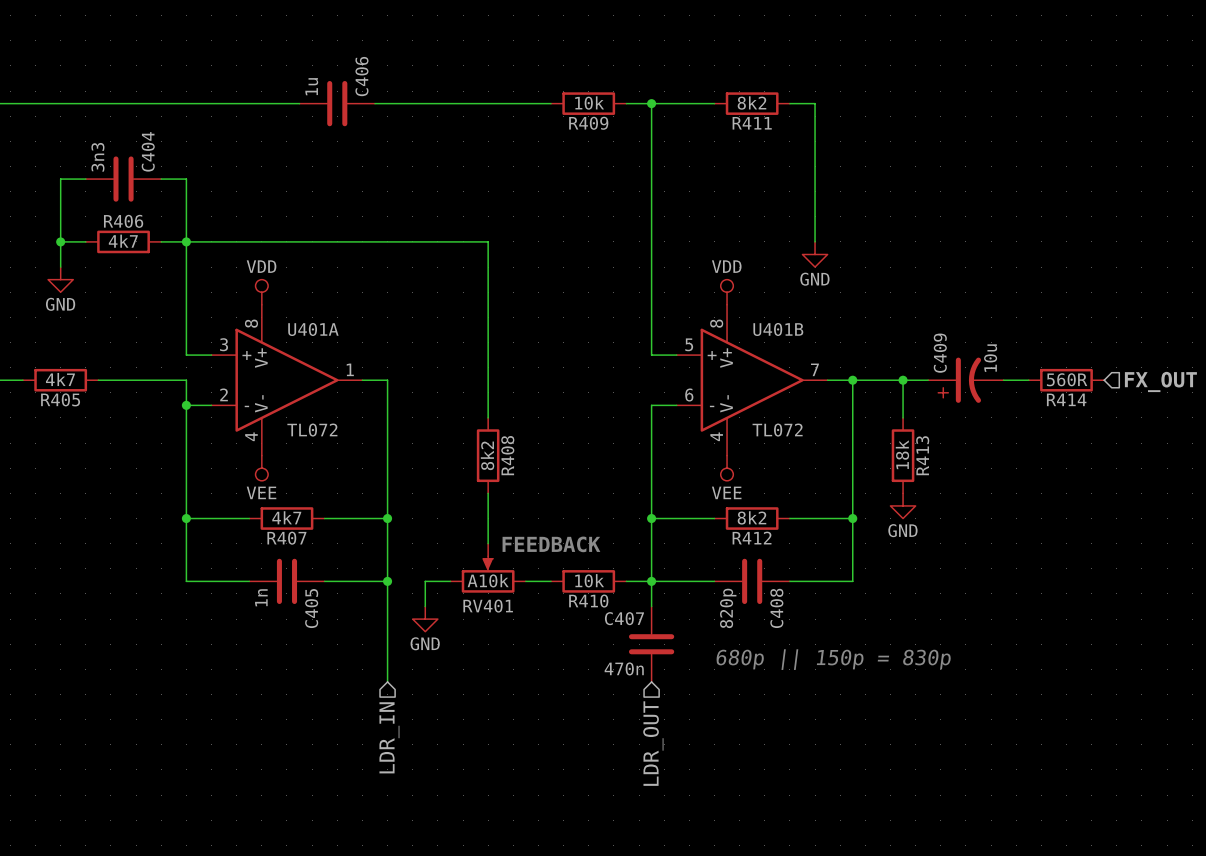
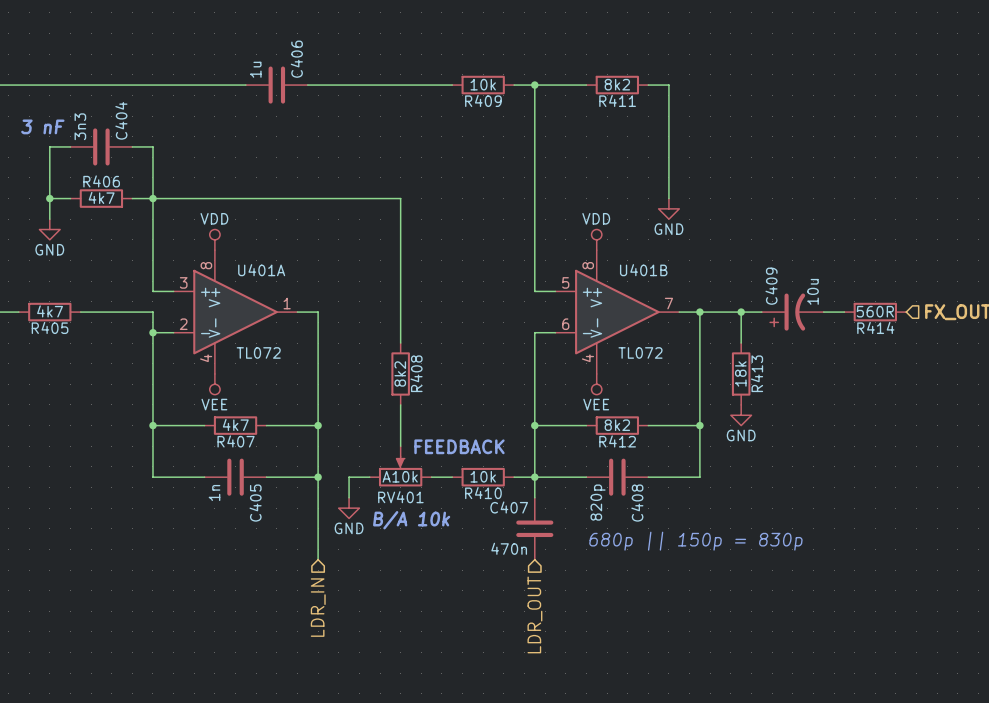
text: none -> 3 nF (42, 126)
text: none -> B/A 10k (411, 520)

